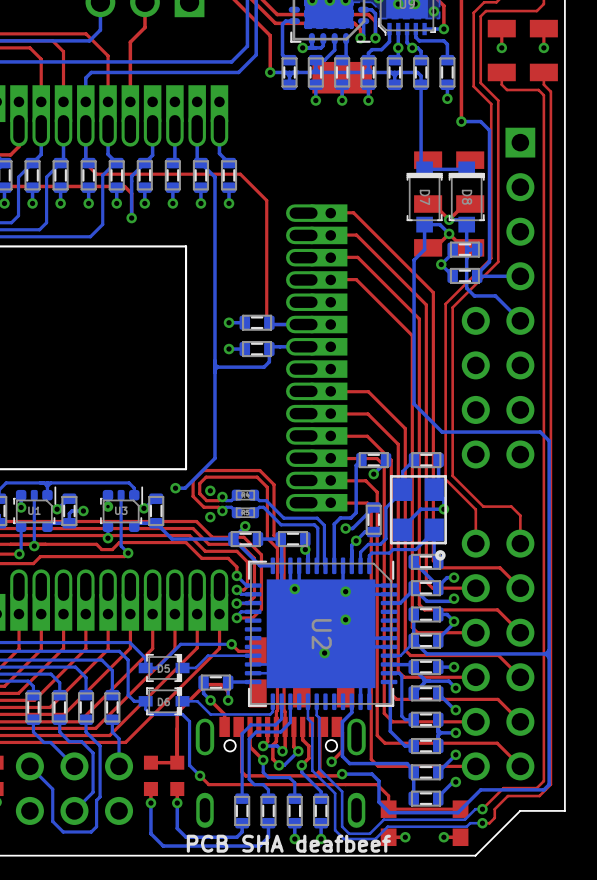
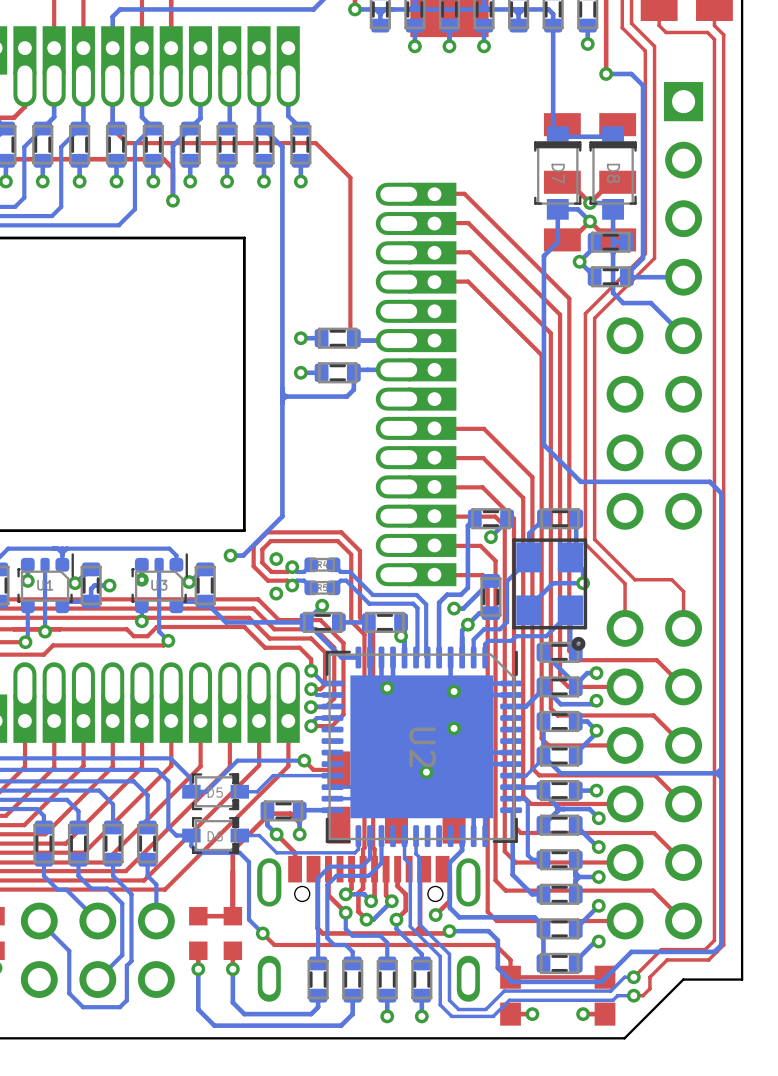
text: PCB SHA deafbeef (288, 843) -> none

